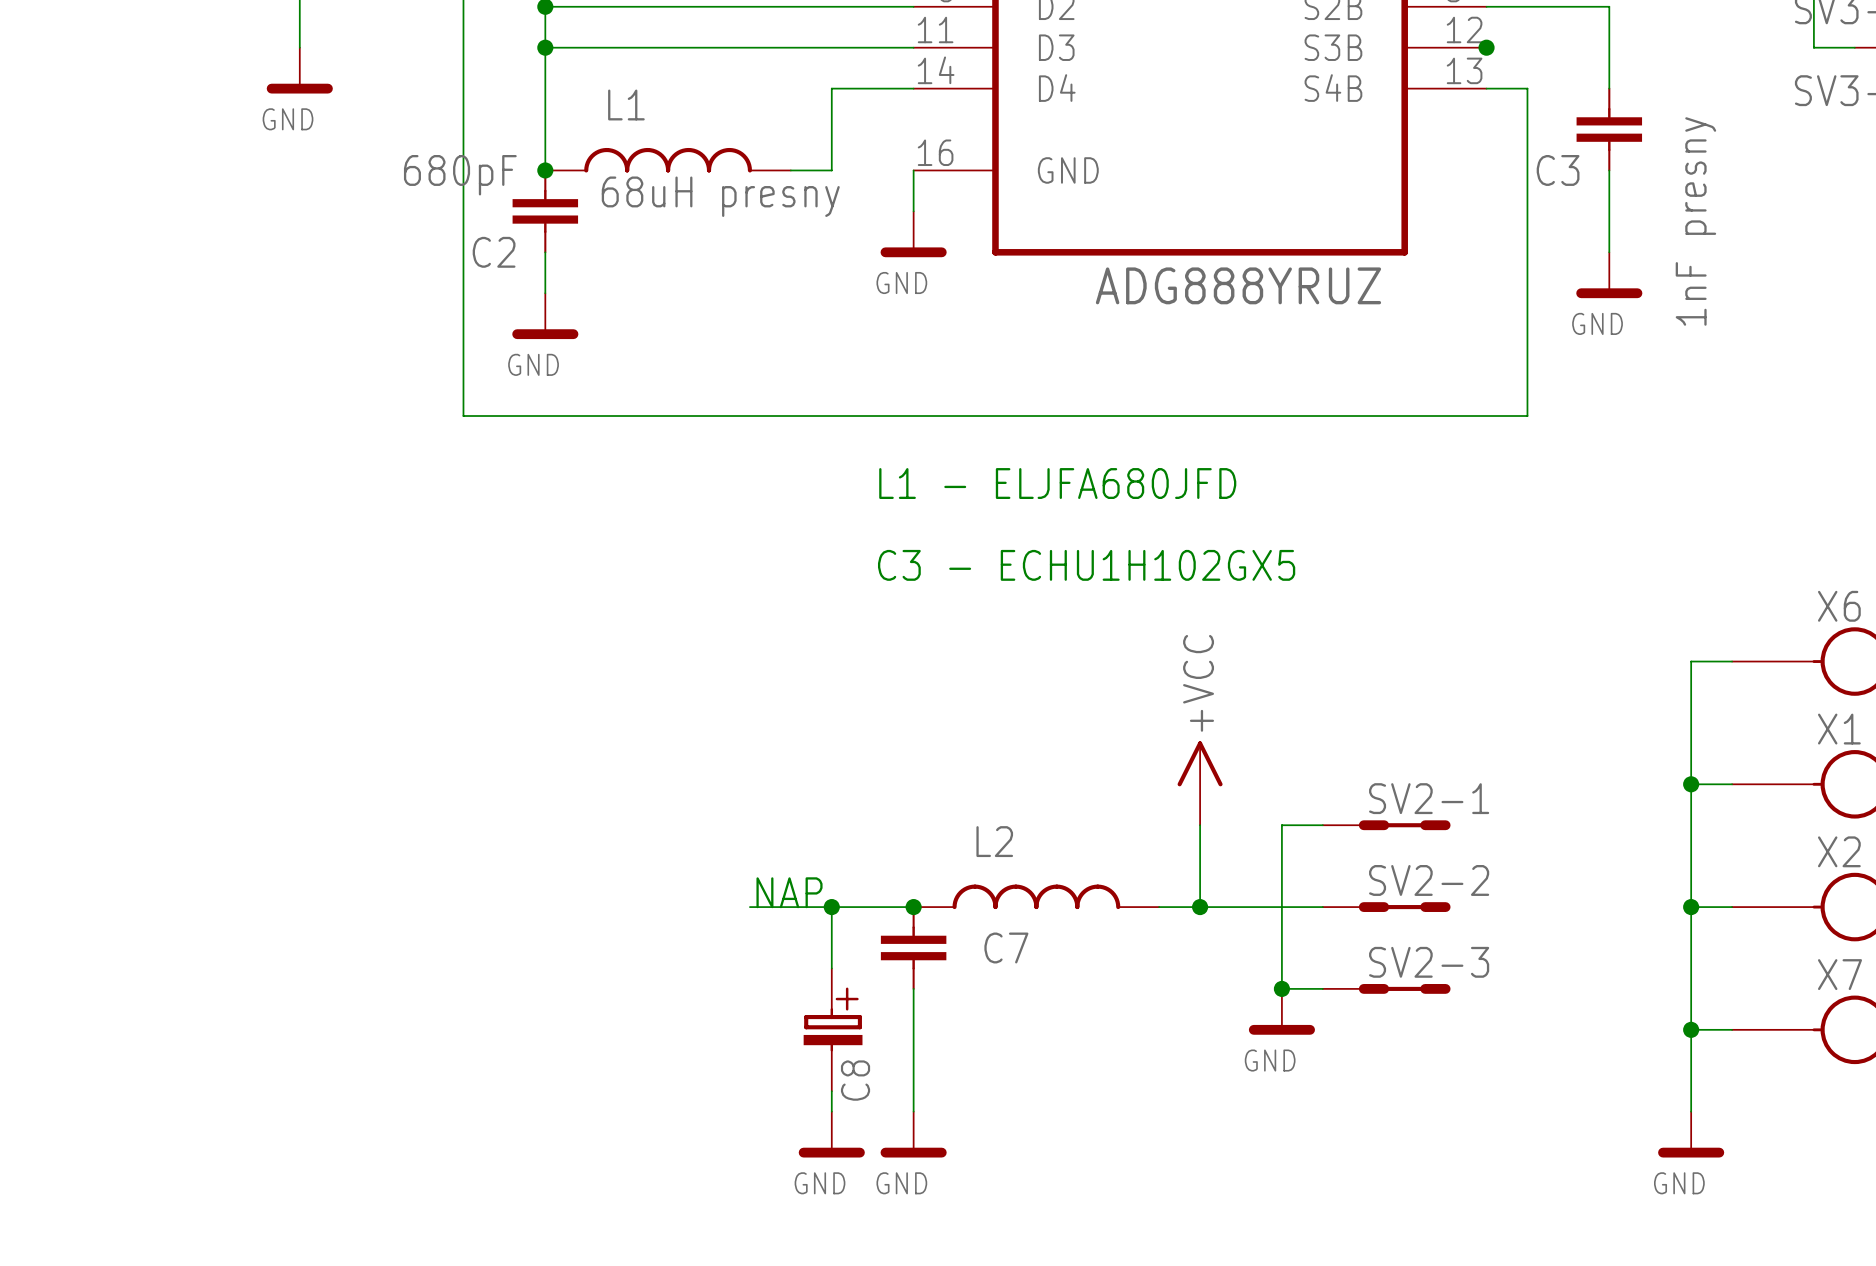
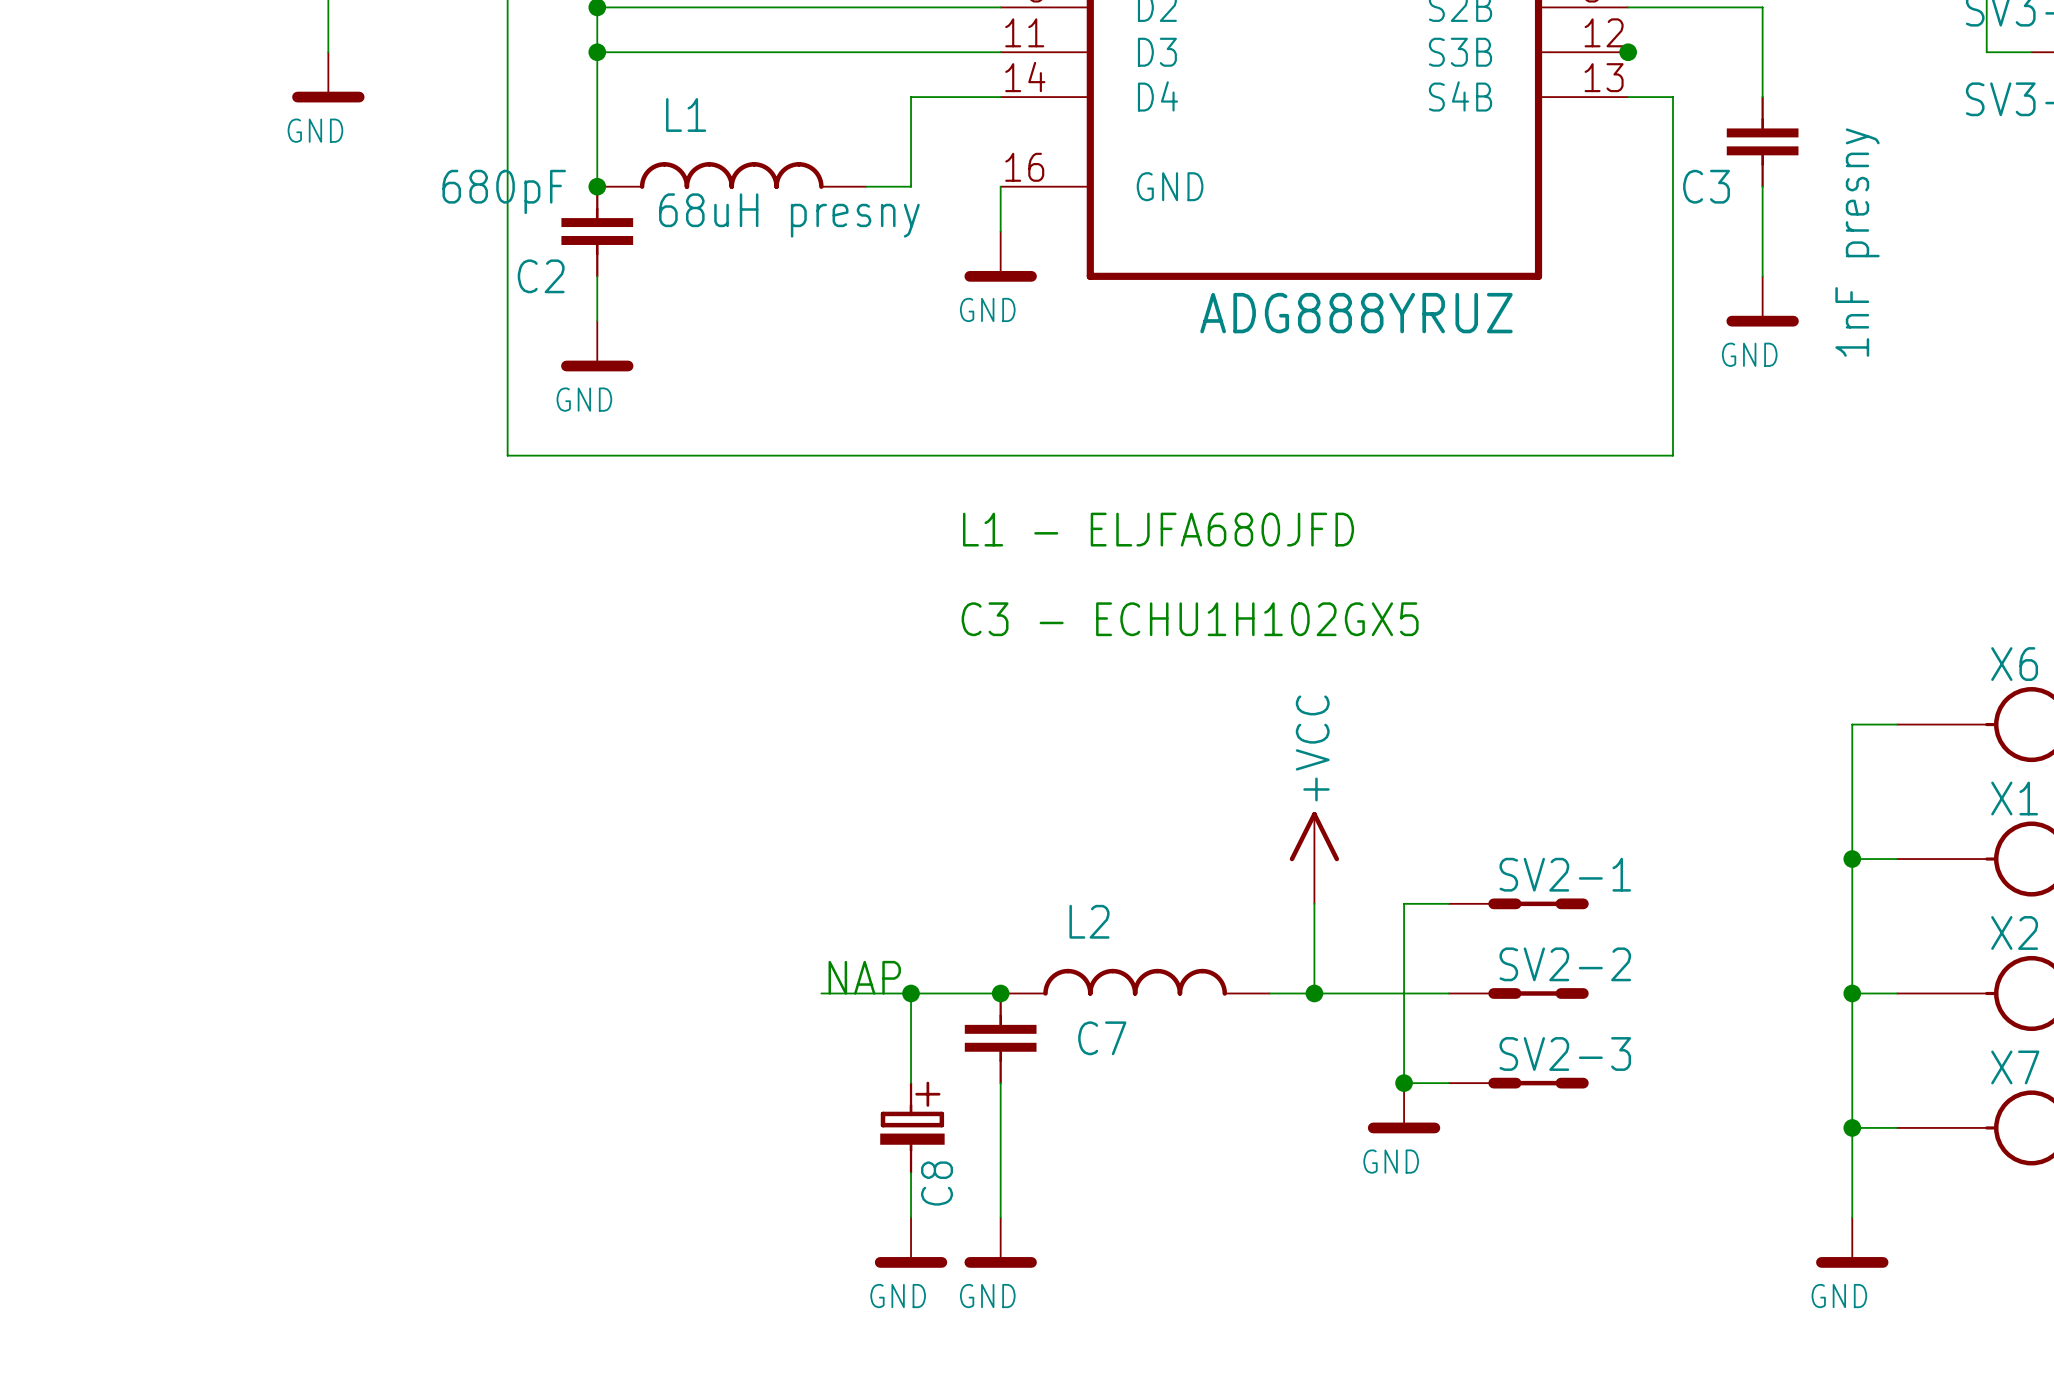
C8 symbol: [803, 968, 863, 1092] -> [880, 1081, 945, 1174]

